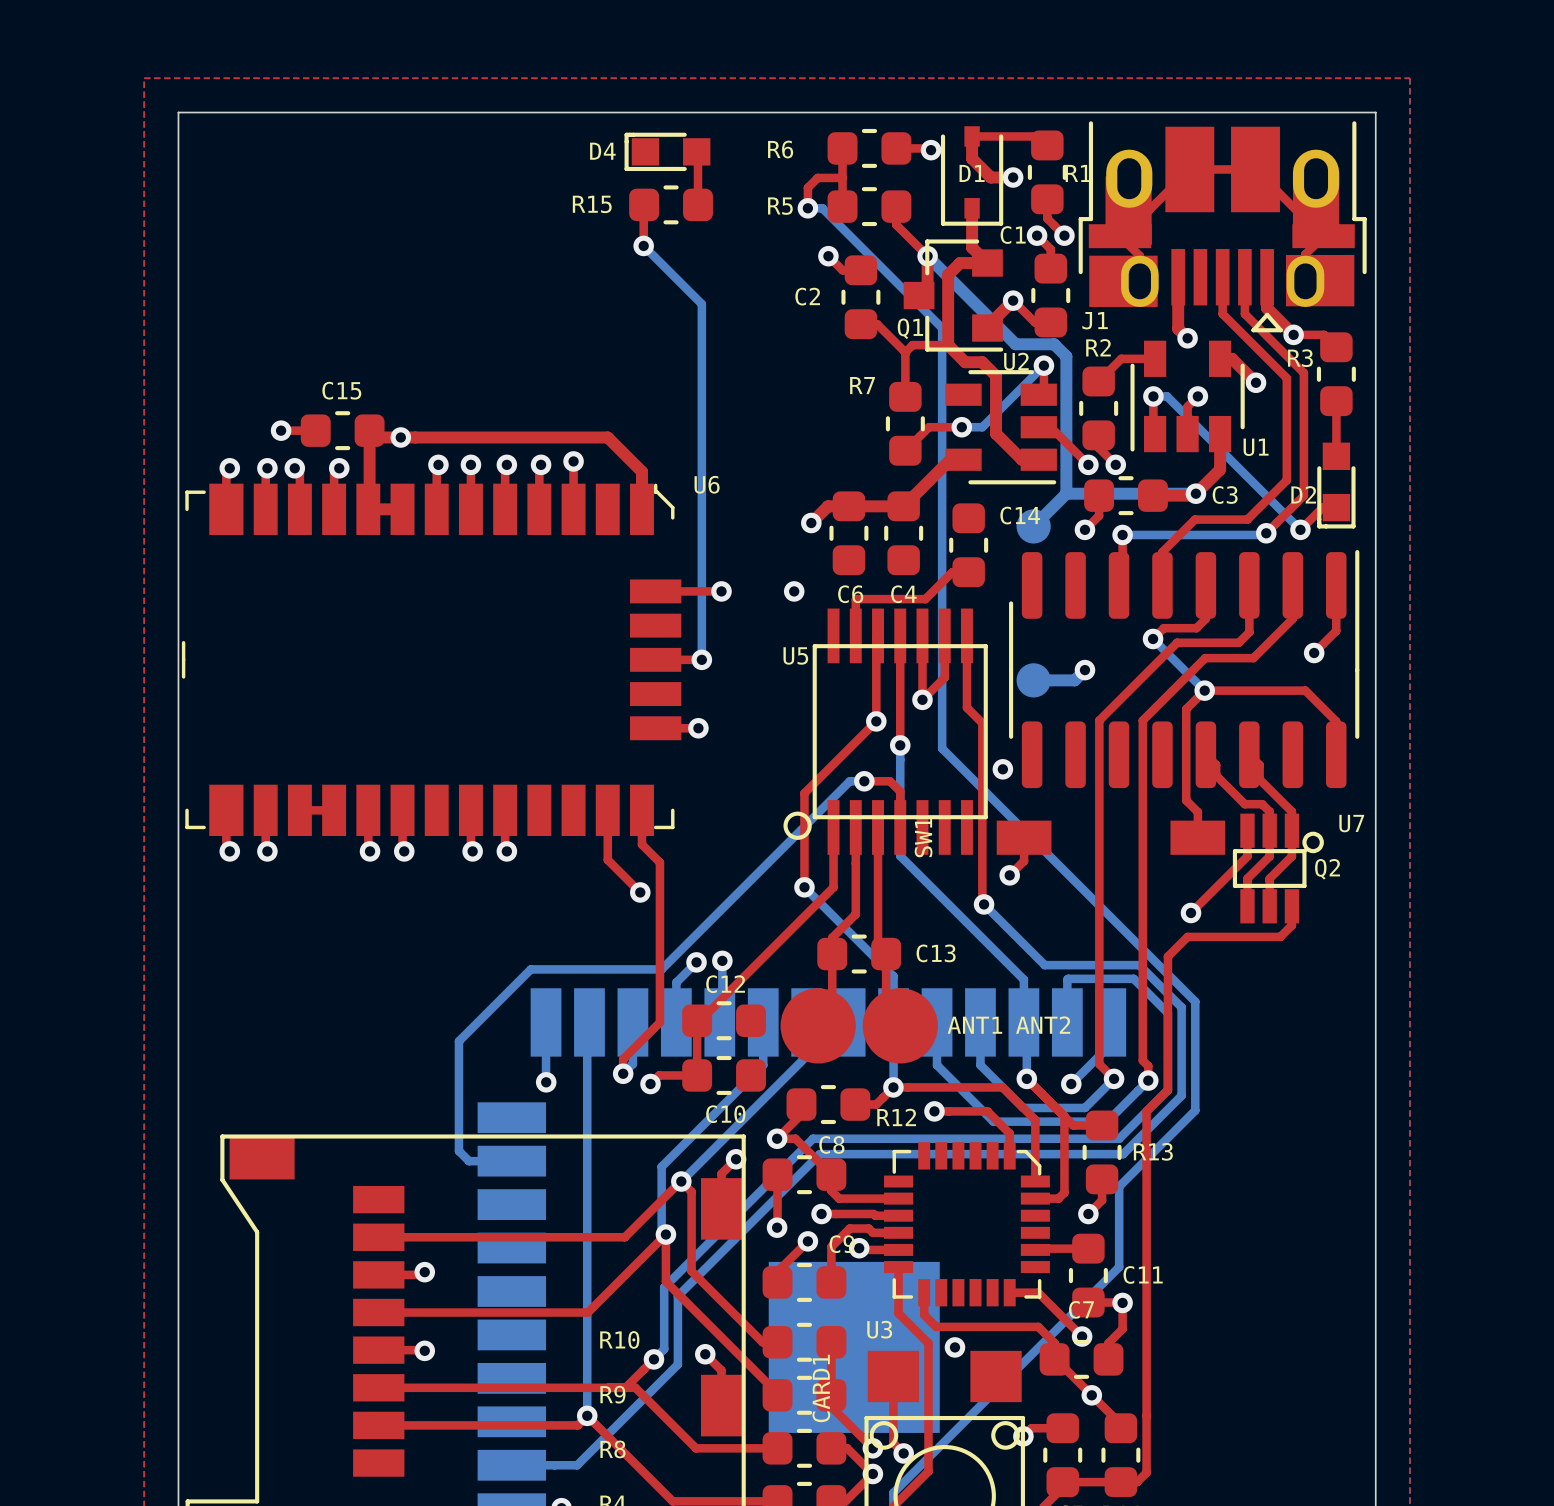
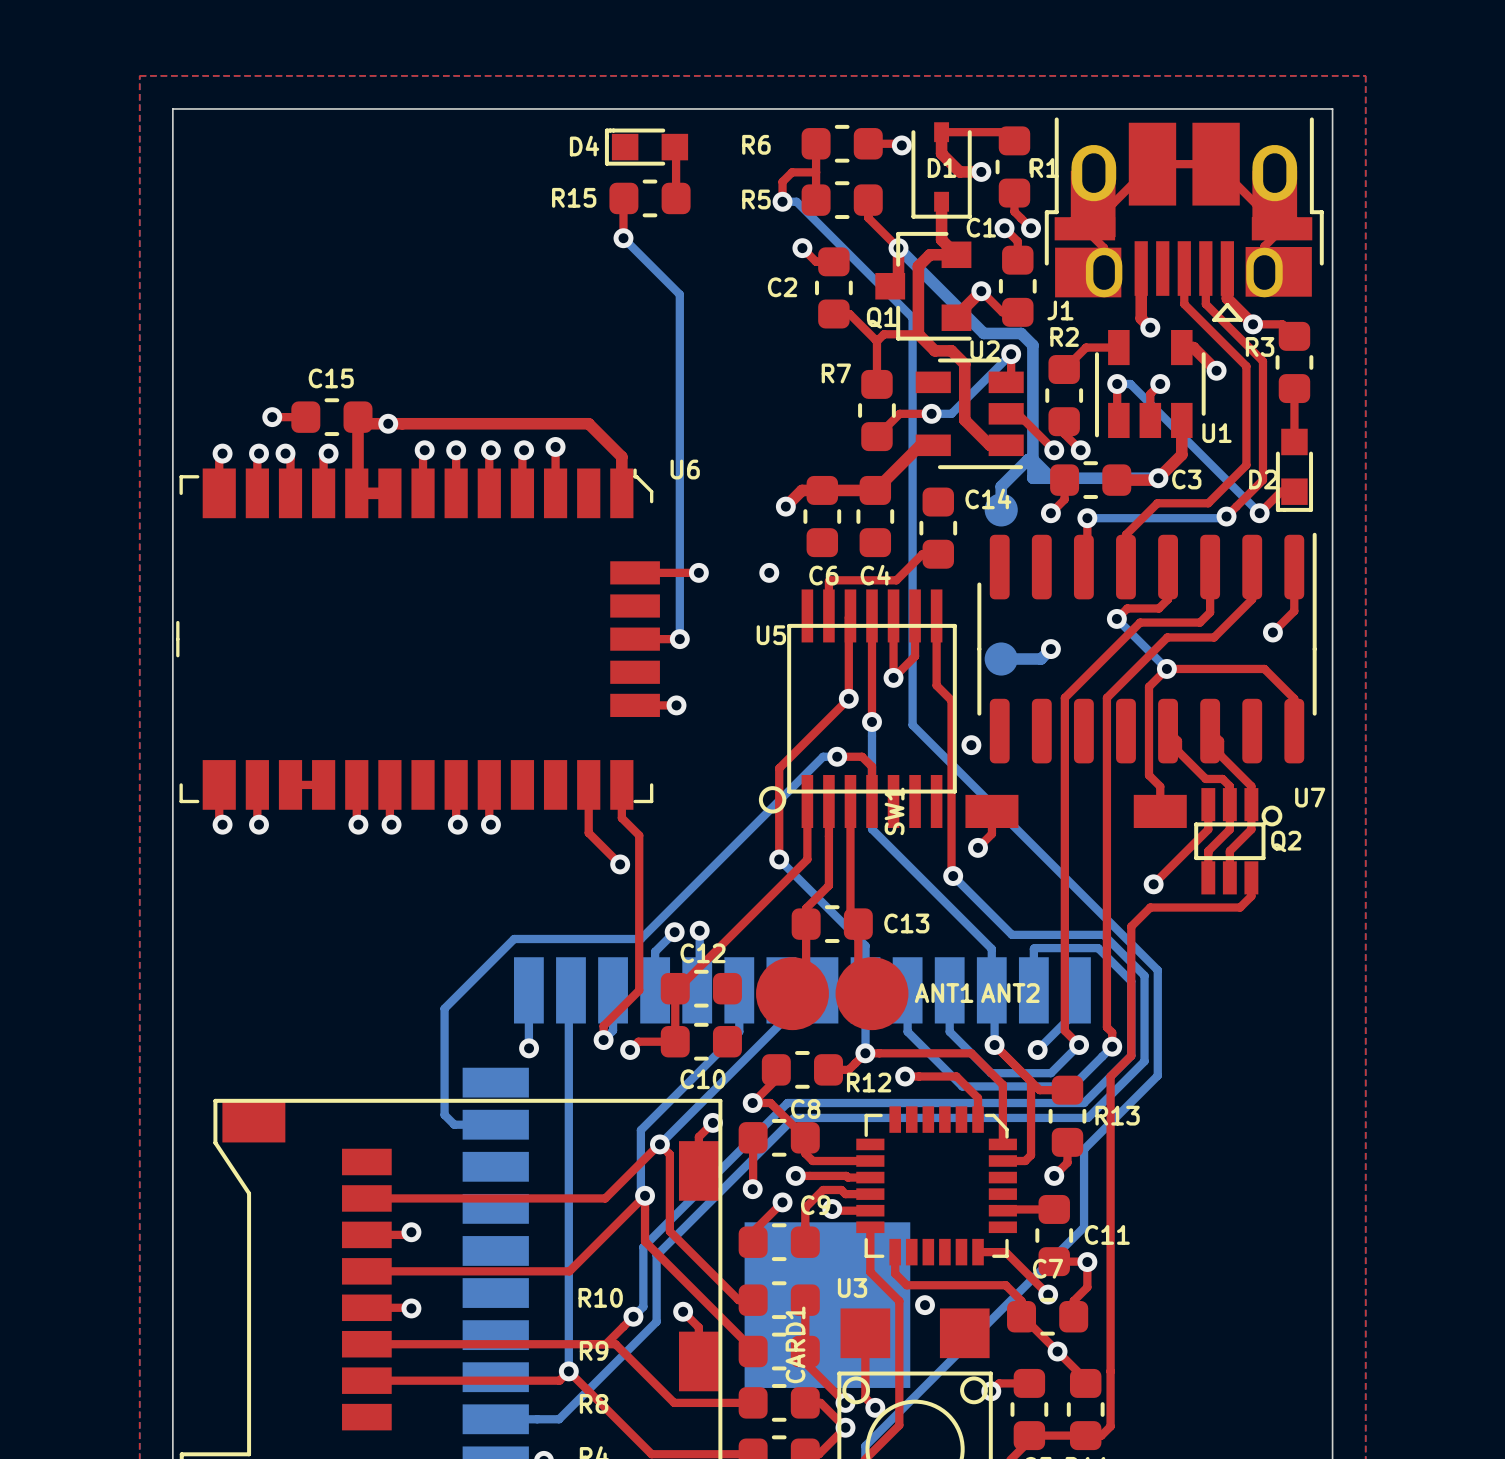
bottom track: (1066, 493) (1033, 526) -> (1051, 478) (1032, 459) (1028, 459) (1001, 486) (1001, 509)

